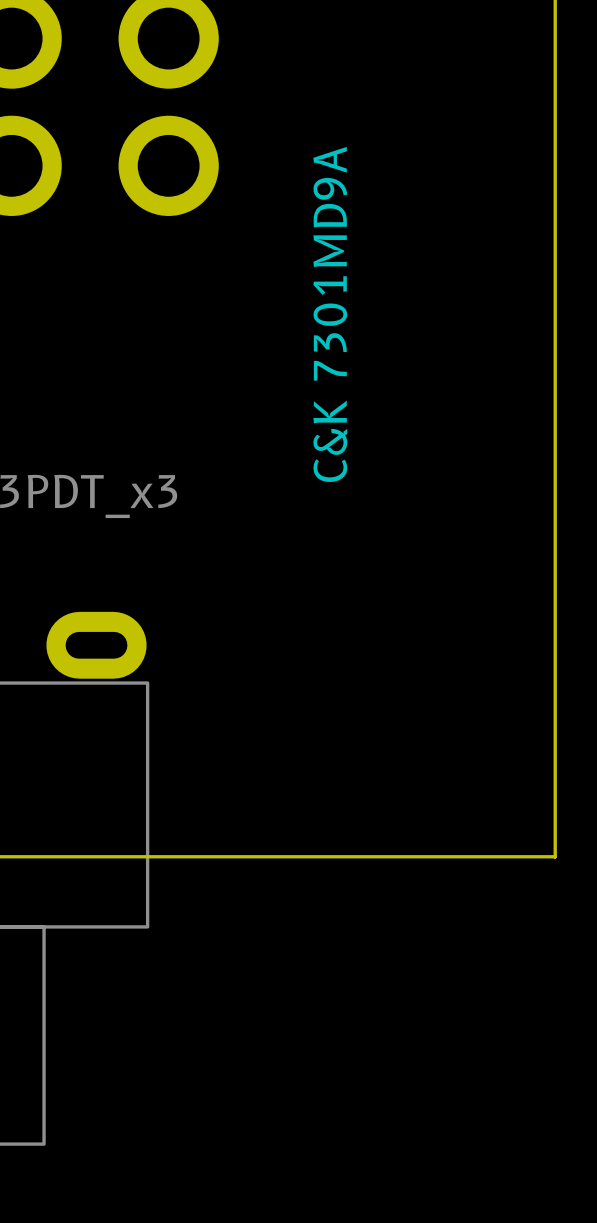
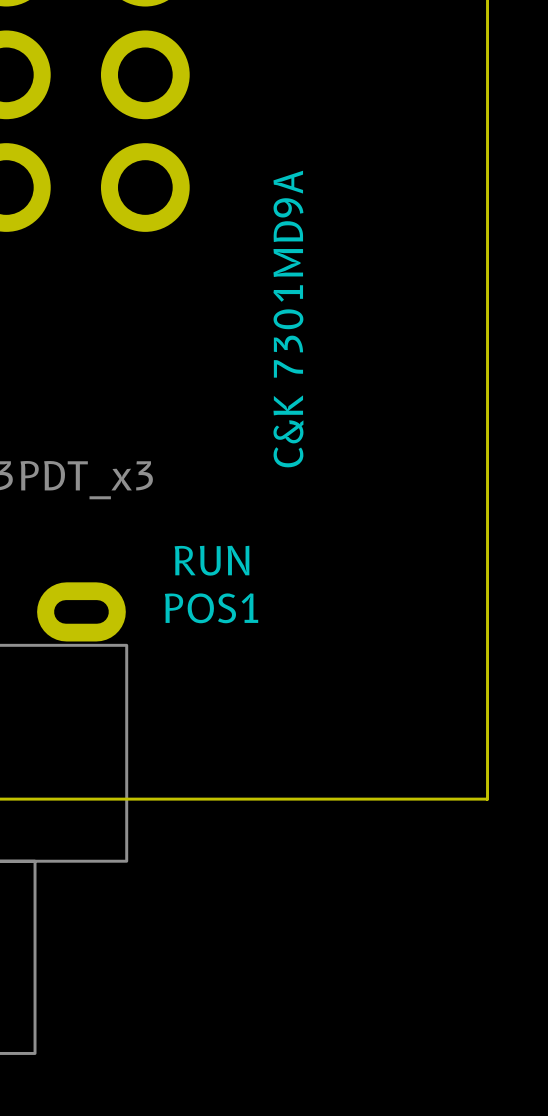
text: none -> RUN (211, 560)
text: none -> POS1 (211, 608)

